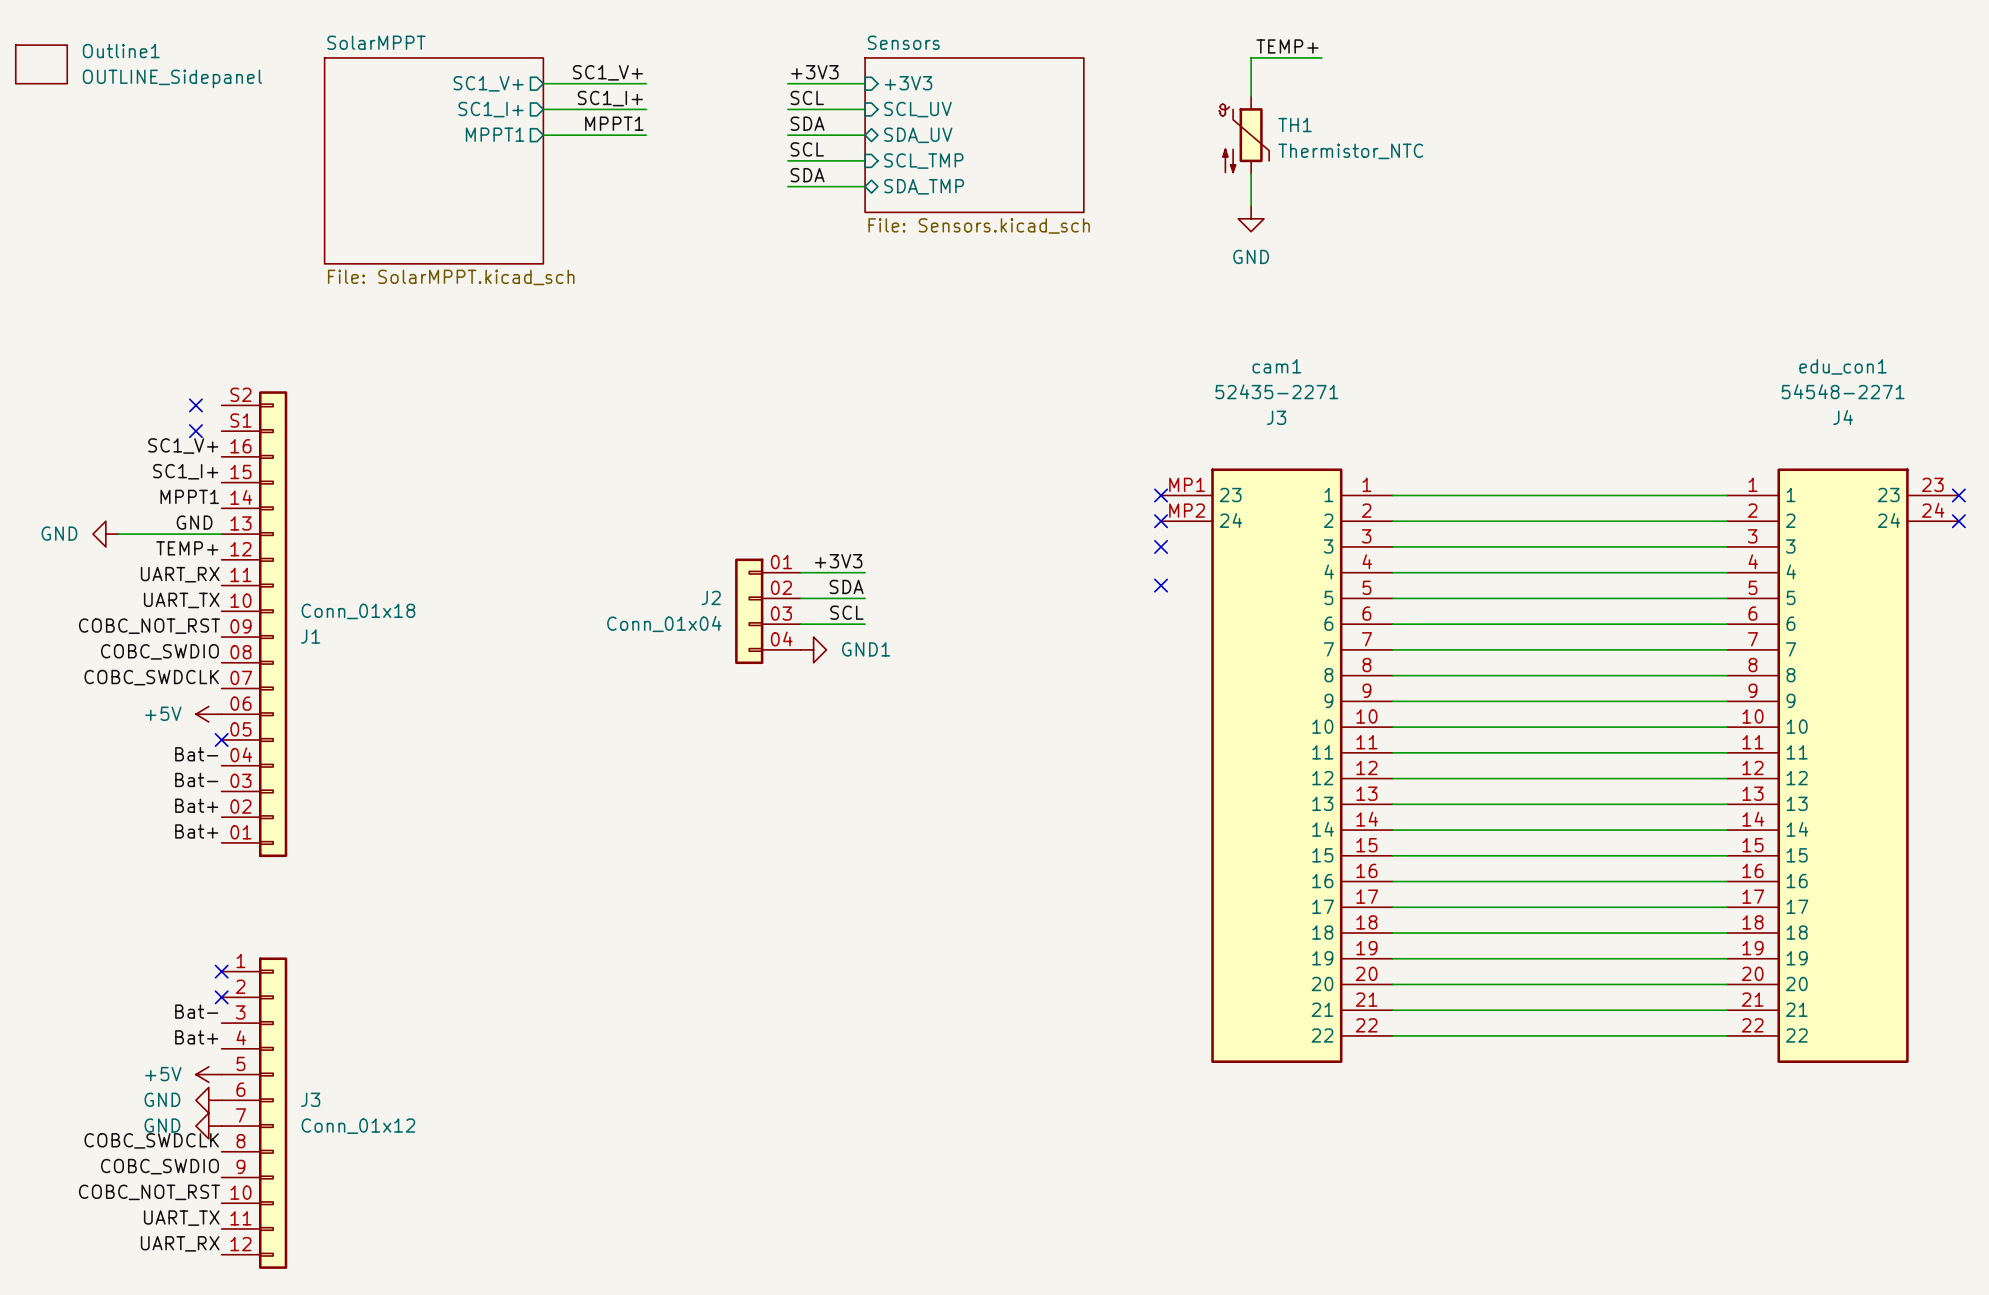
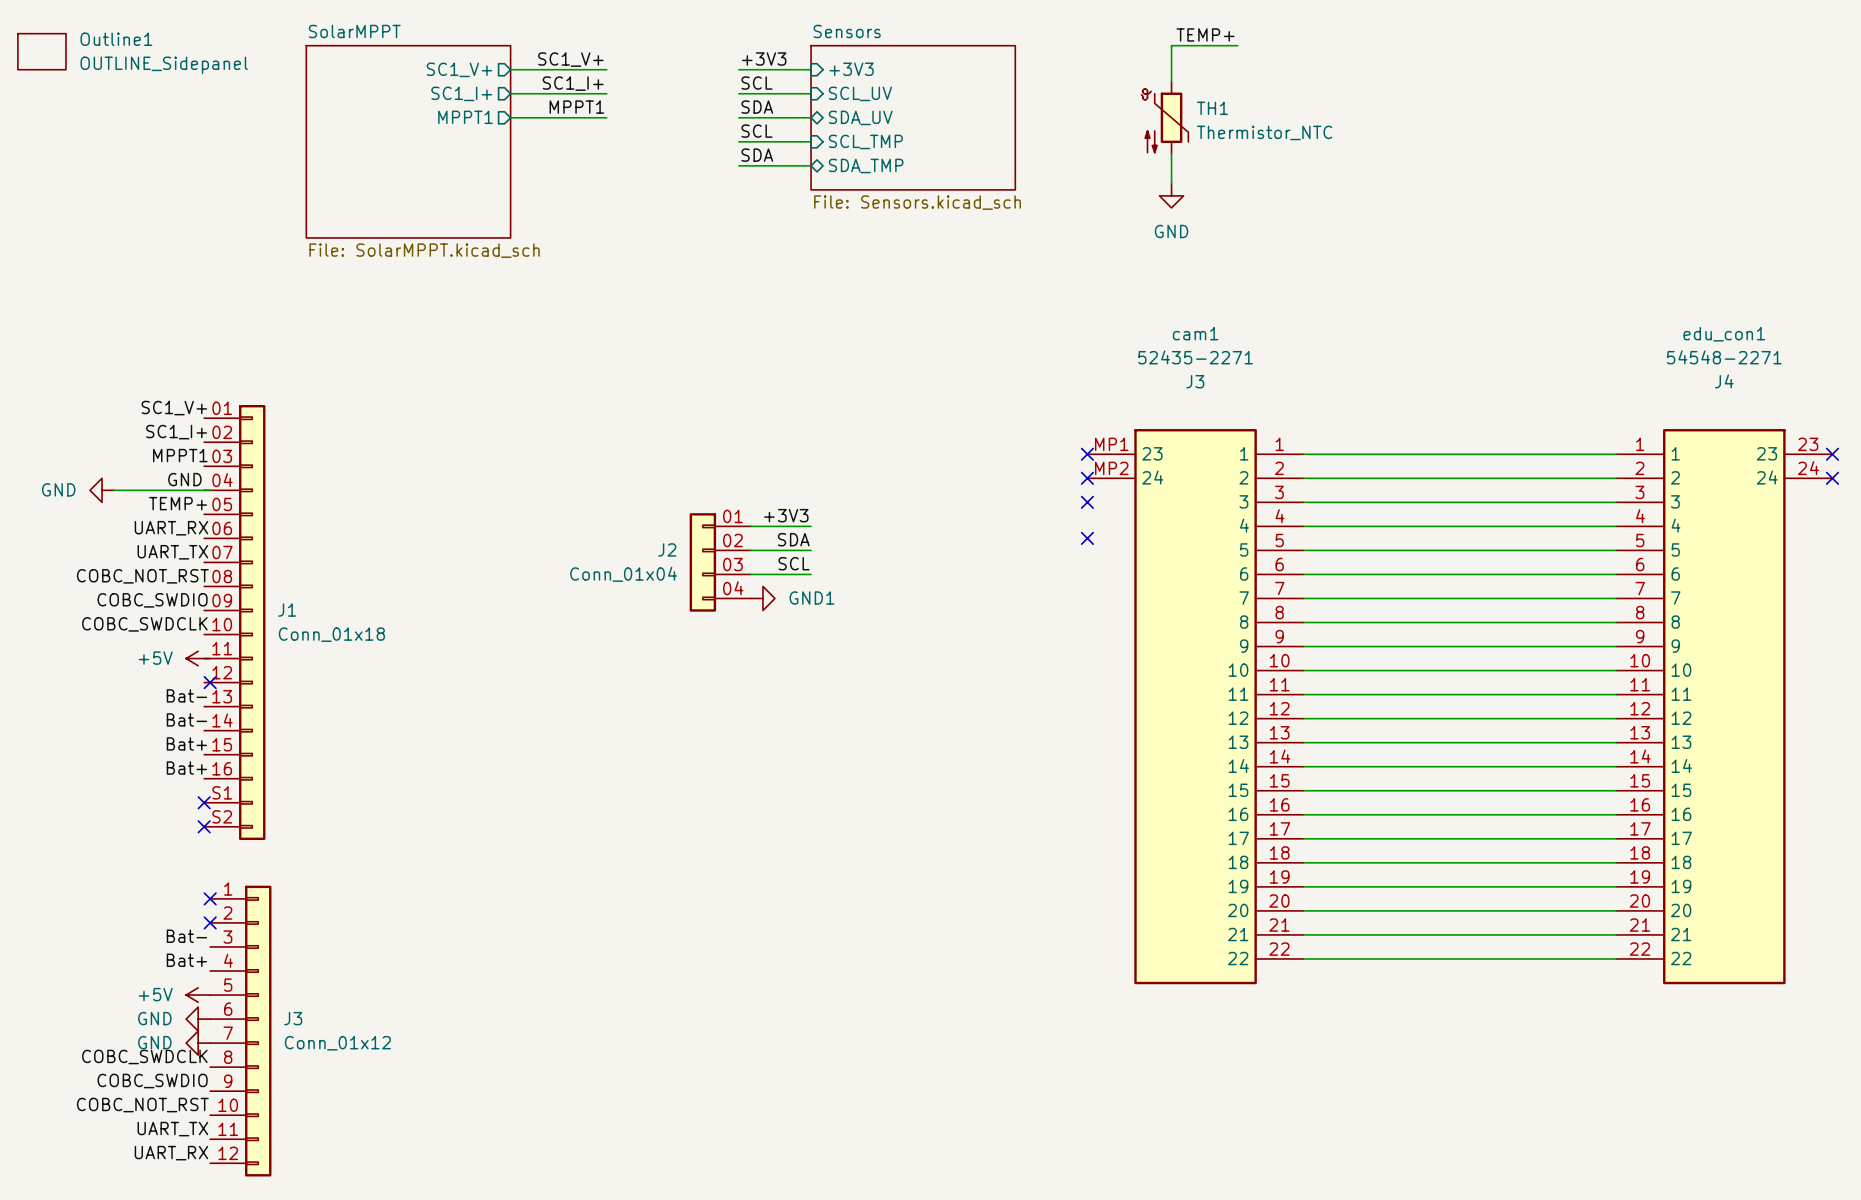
no-connect mark: (195, 405) -> none
no-connect mark: (195, 431) -> none
J1 flip: as is (273, 624) -> up-down (252, 622)
no-connect mark: none -> (204, 802)
no-connect mark: none -> (204, 826)

